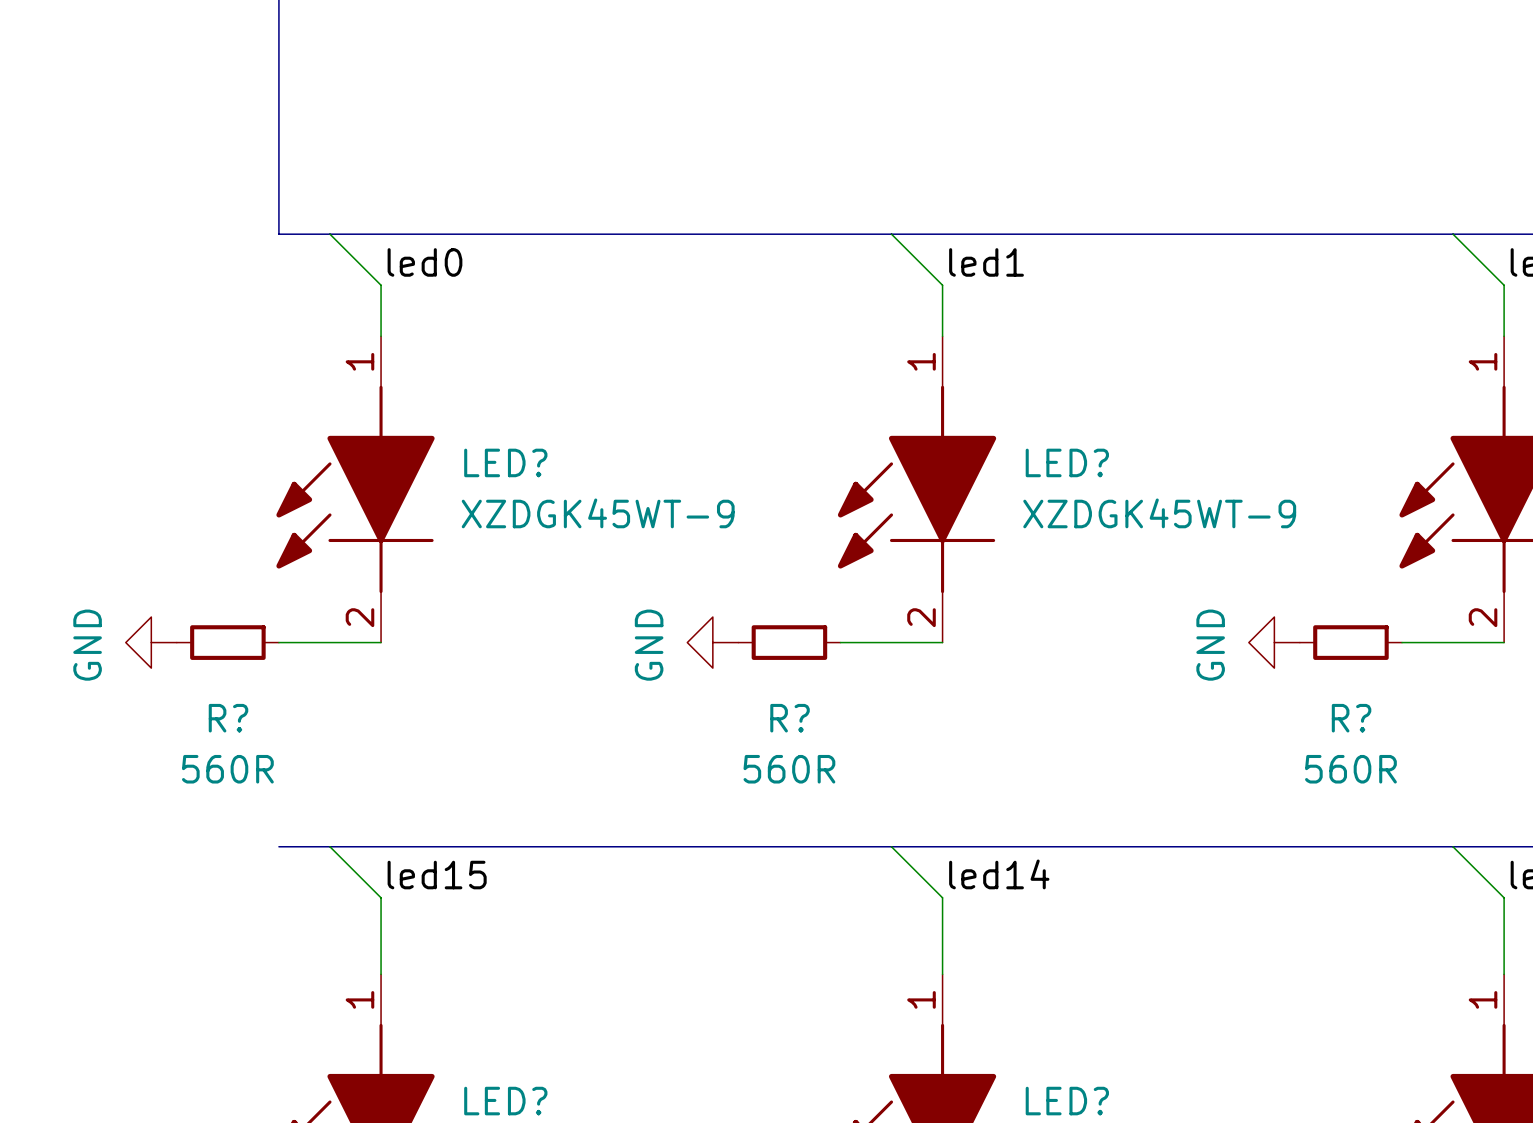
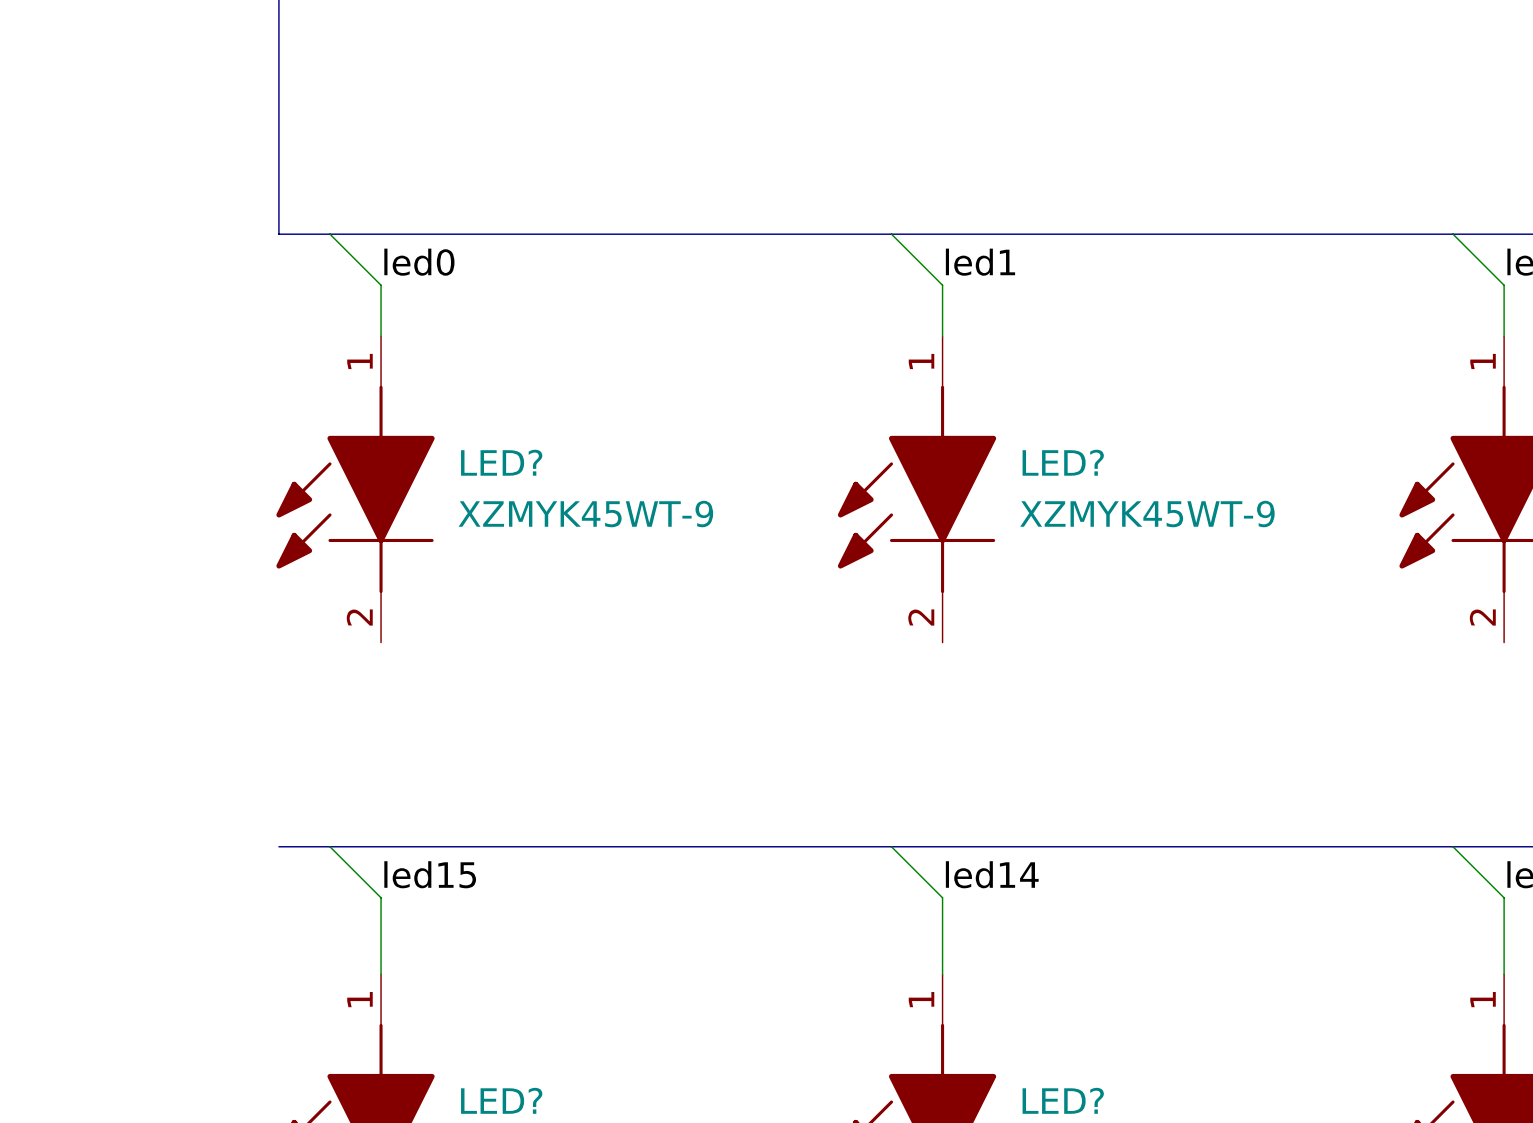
LED? value: XZDGK45WT-9 (598, 513) -> XZMYK45WT-9 (585, 514)
LED? value: XZDGK45WT-9 (1159, 513) -> XZMYK45WT-9 (1147, 514)
power symbol: GND (151, 642) -> none
R?: 560R (227, 642) -> none
wire: (278, 642) (381, 642) -> none
power symbol: GND (712, 642) -> none
R?: 560R (789, 642) -> none
wire: (840, 642) (942, 642) -> none
power symbol: GND (1274, 642) -> none
R?: 560R (1350, 642) -> none
wire: (1401, 642) (1504, 642) -> none

